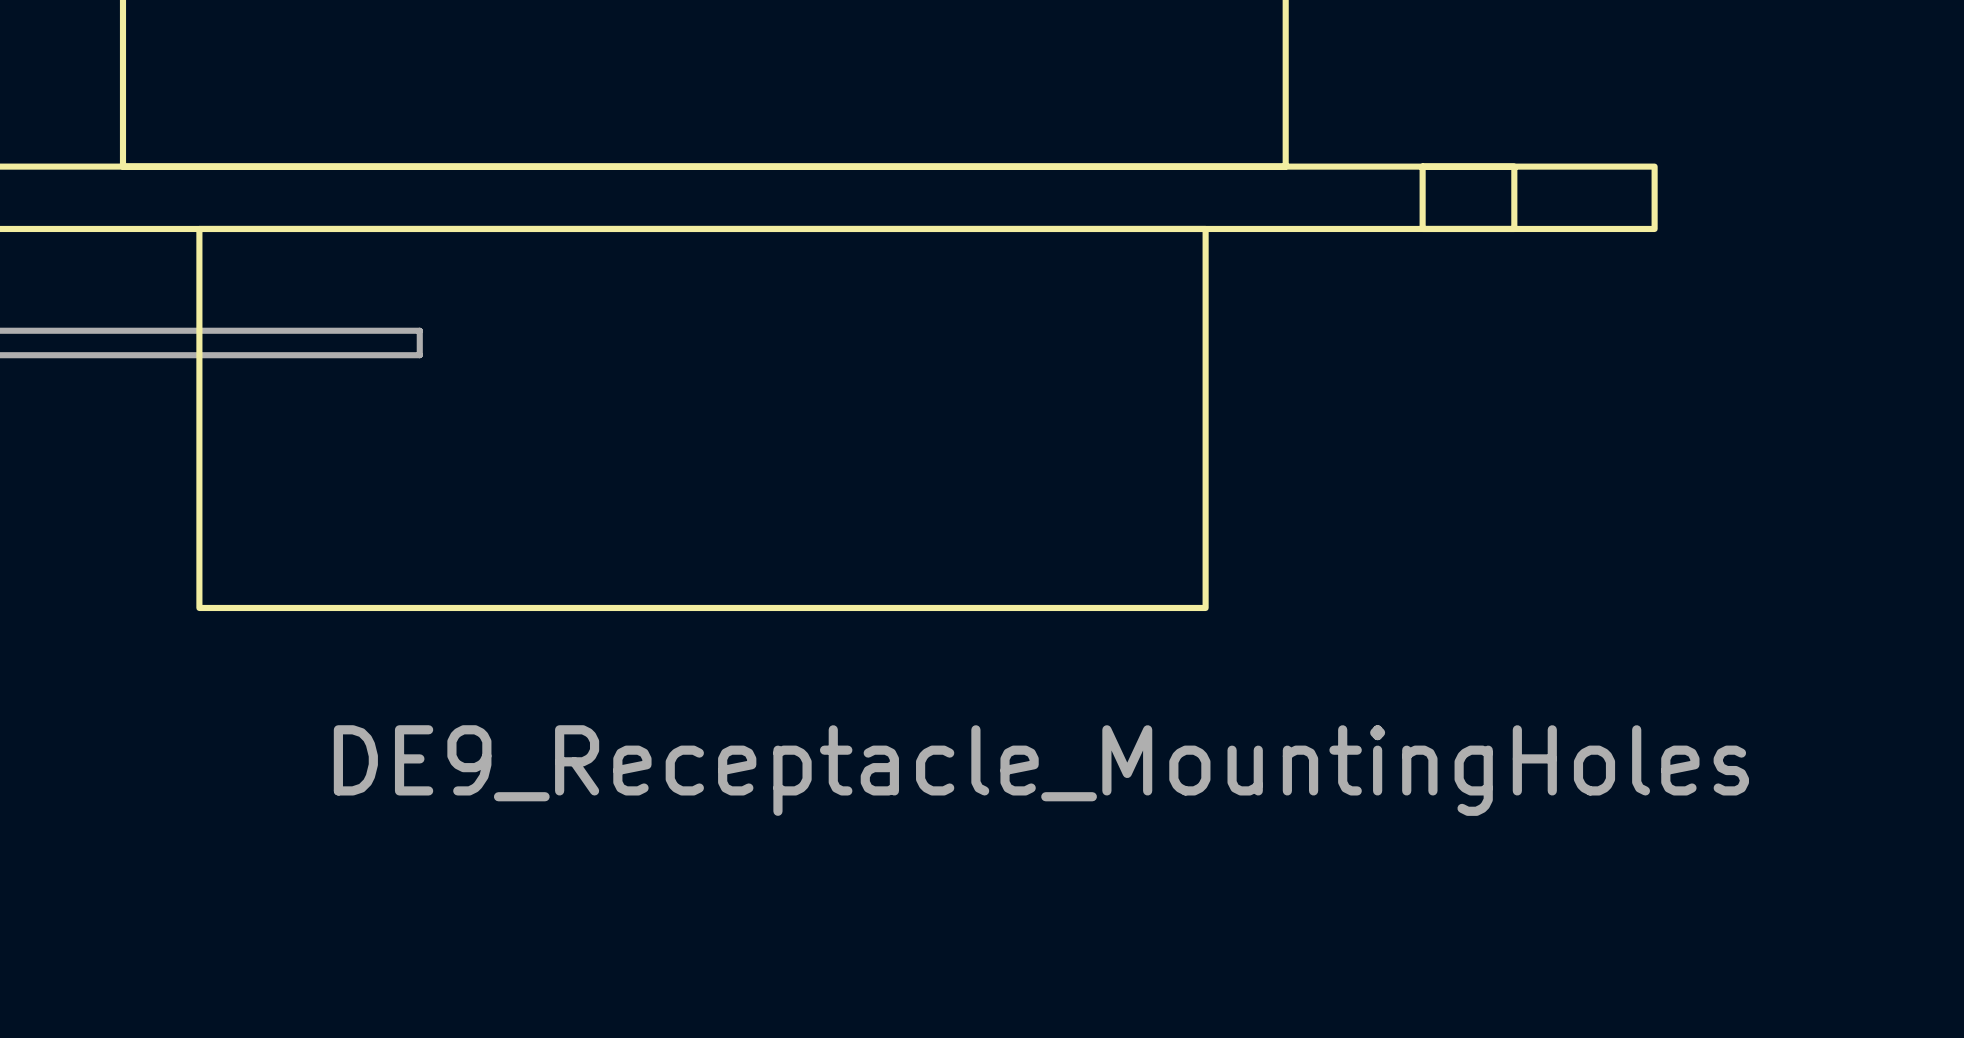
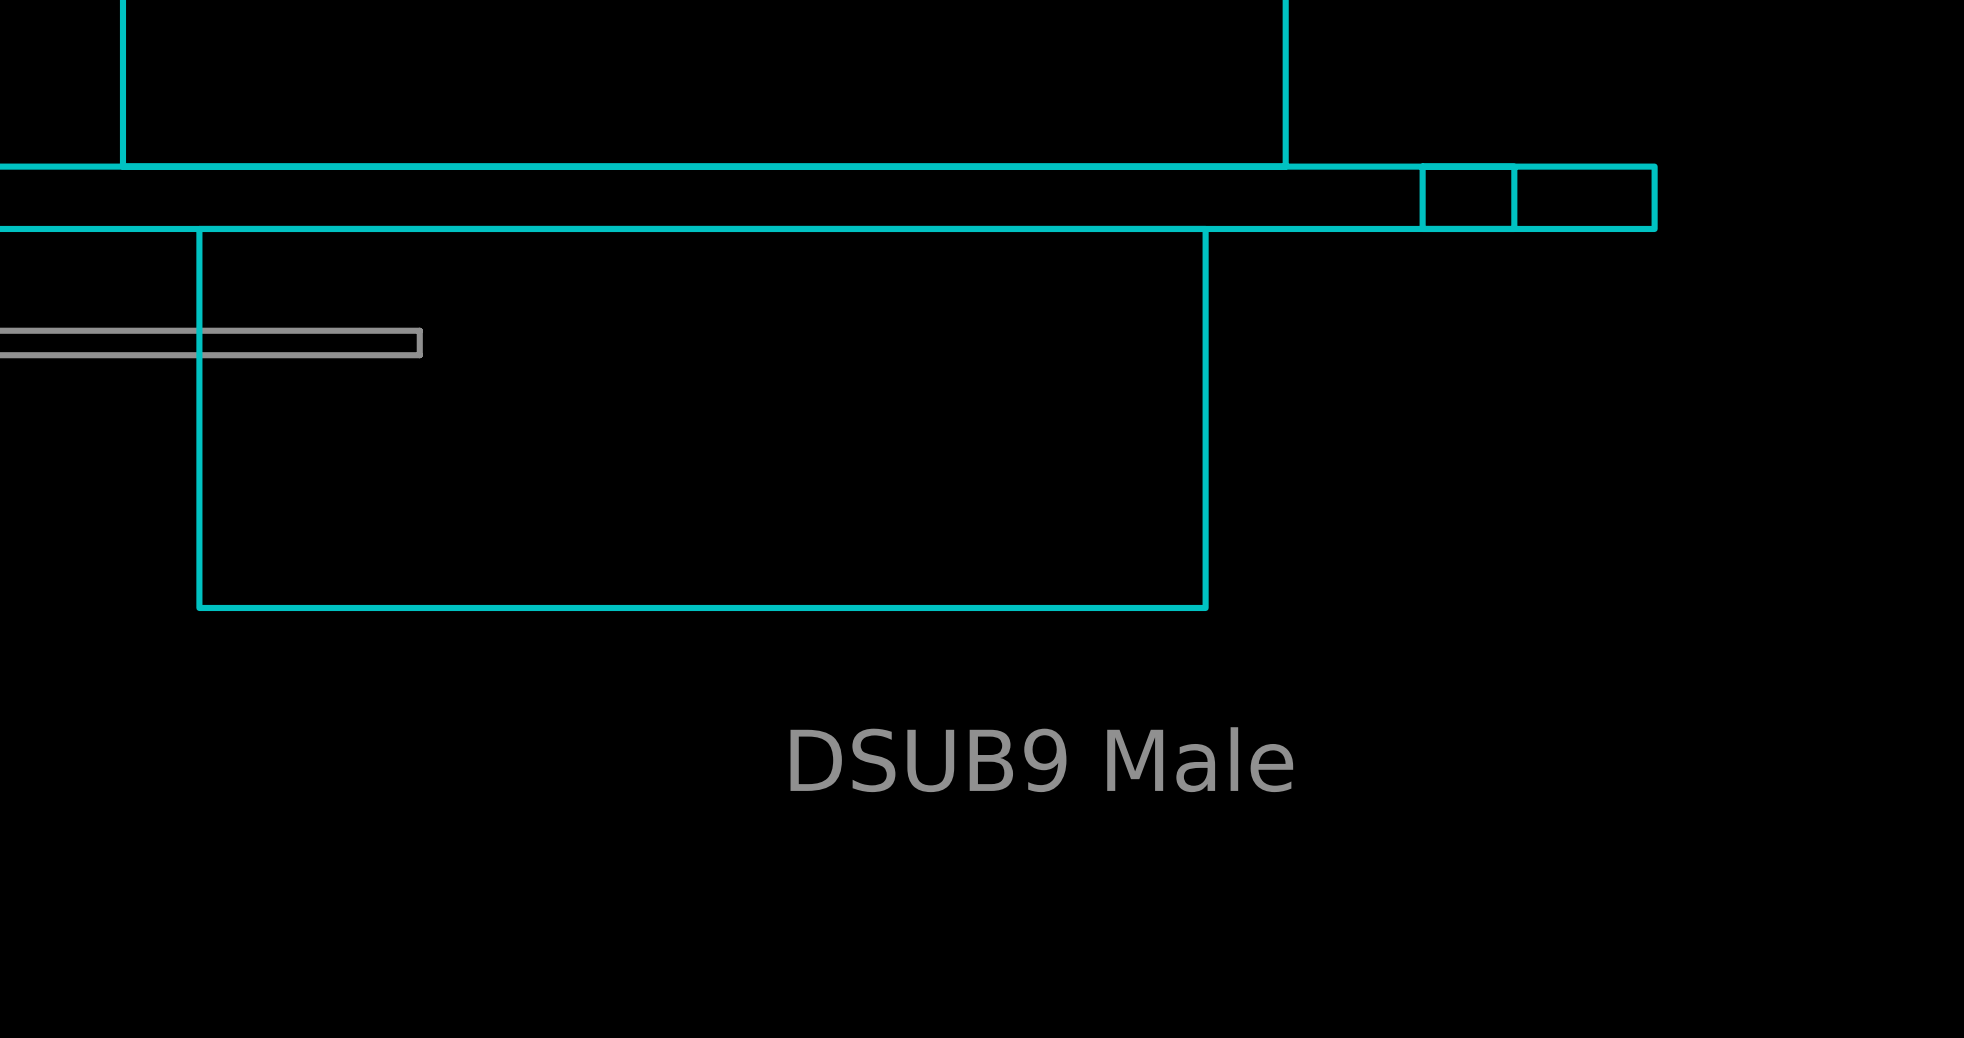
part value: DE9_Receptacle_MountingHoles (1041, 770) -> DSUB9 Male (1041, 759)

